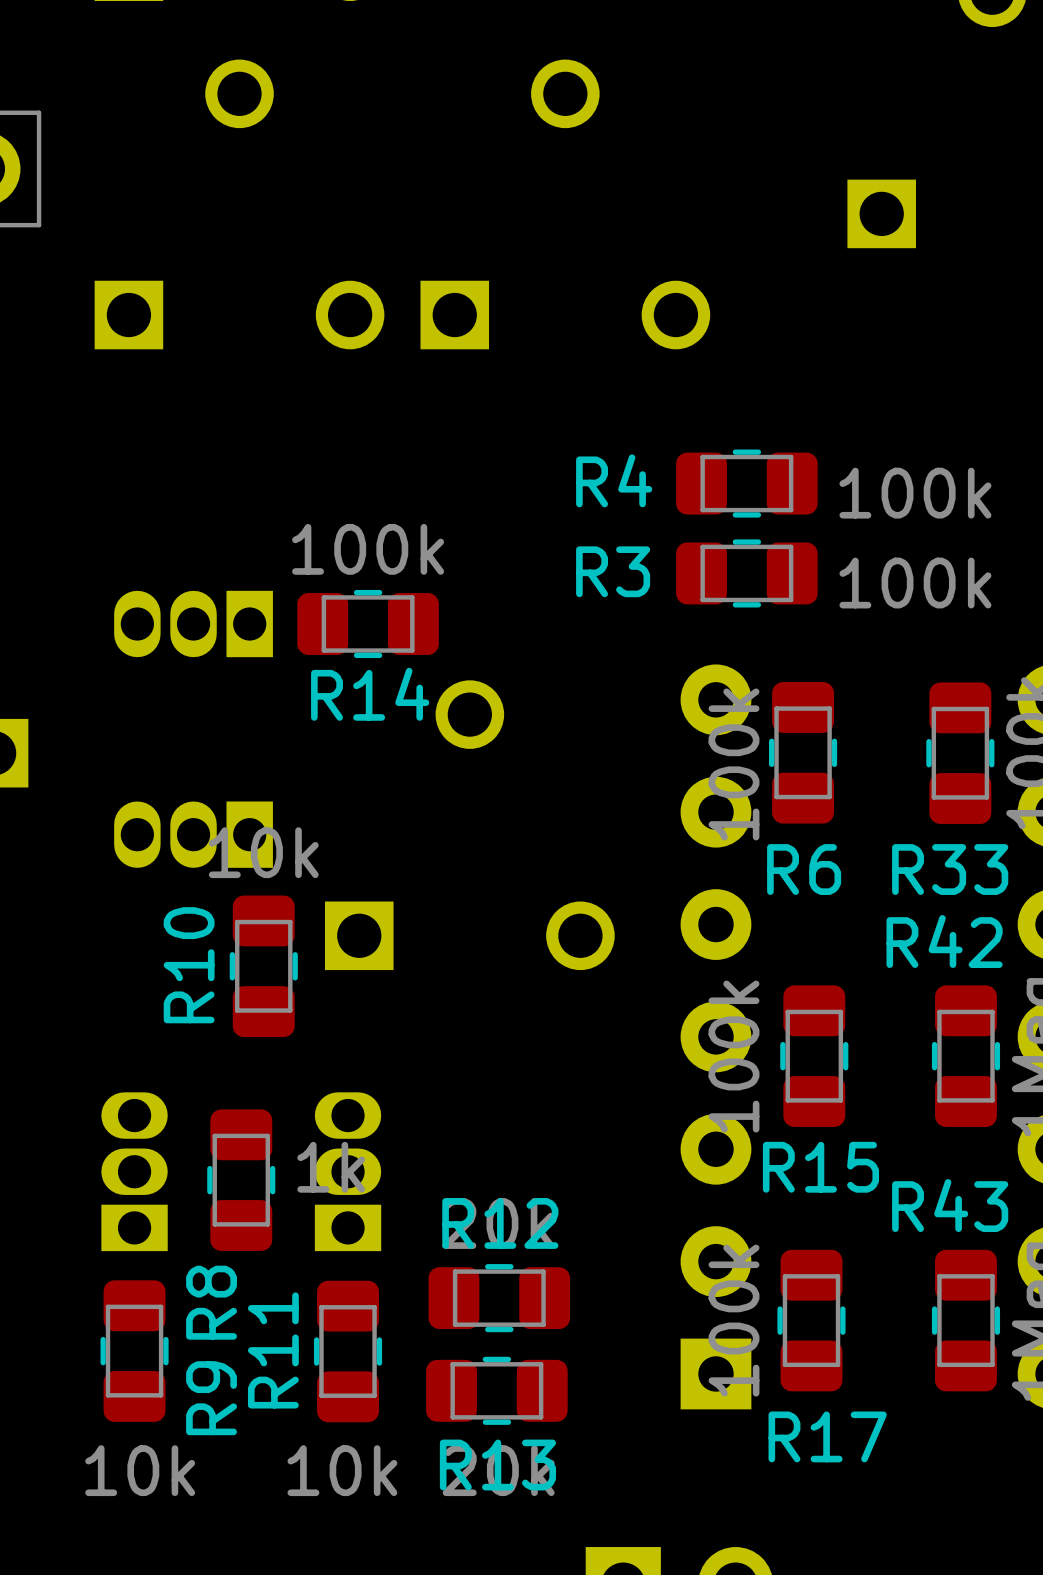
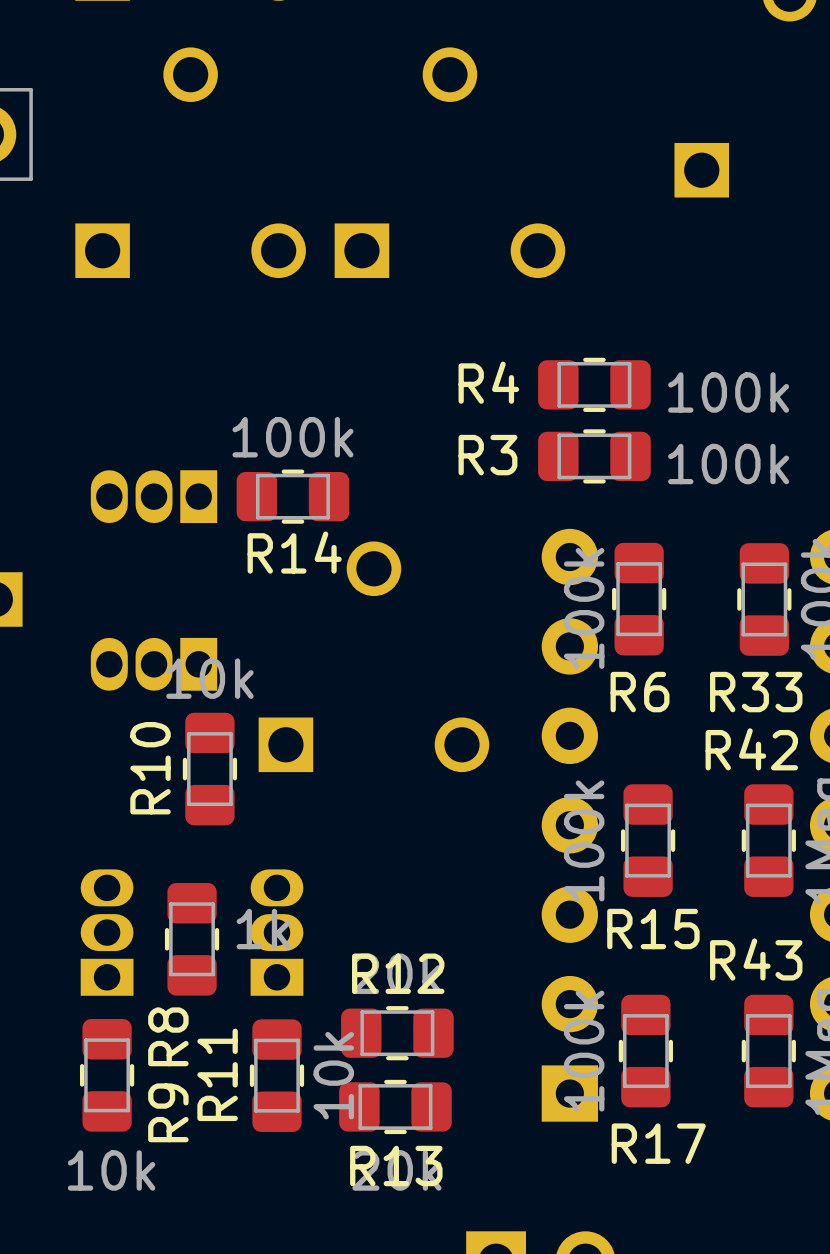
R11 value rotation: 0° (342, 1470) -> 90° counterclockwise (333, 1075)

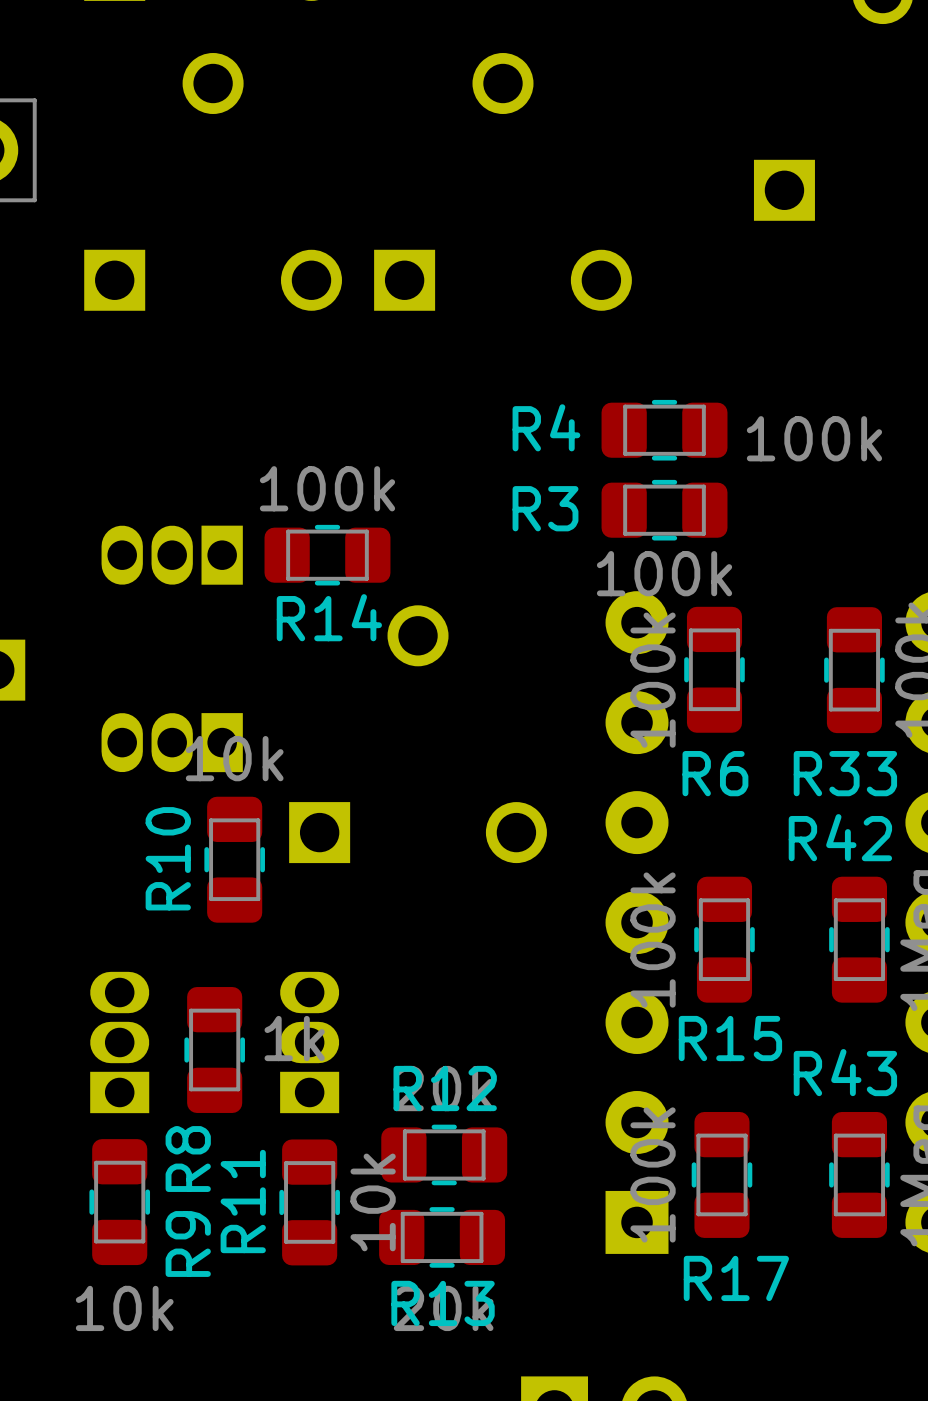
R3 value position: 100k (728, 464) -> 100k (664, 573)

